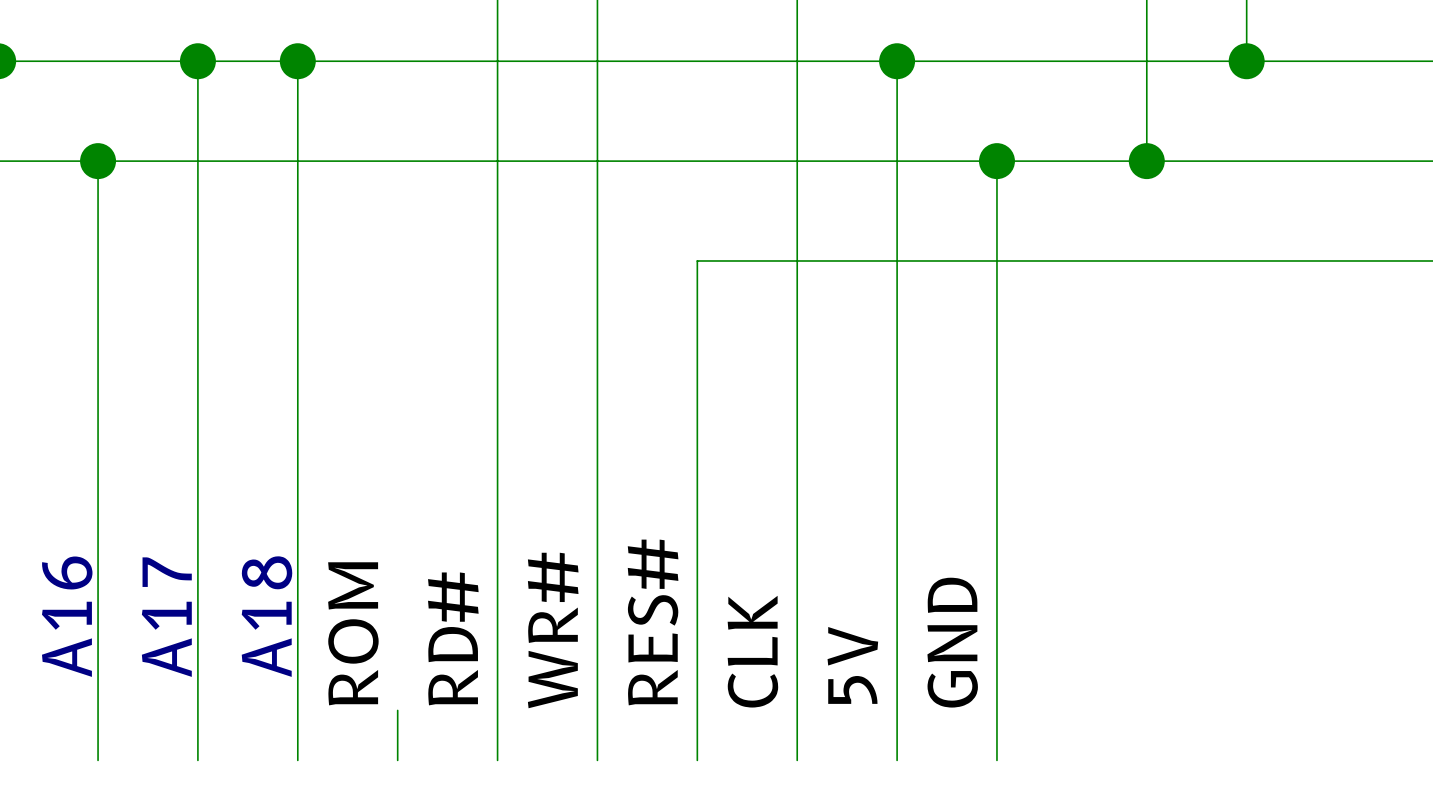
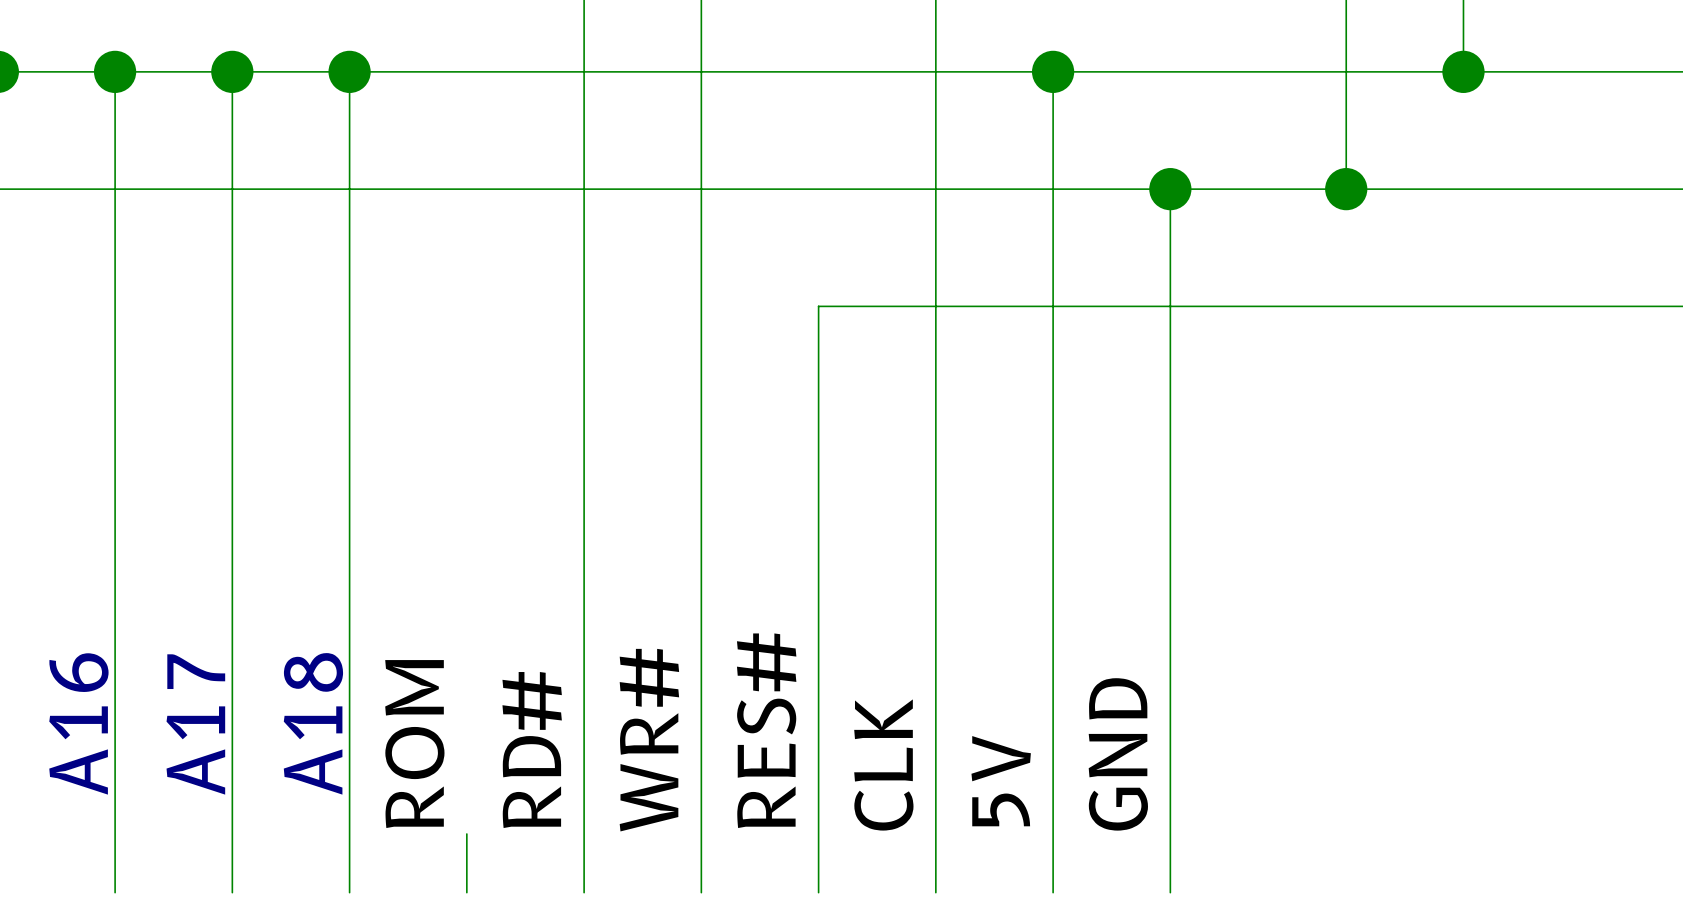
wire: none -> (115, 71) (115, 189)
junction position: (98, 161) -> (115, 71)

